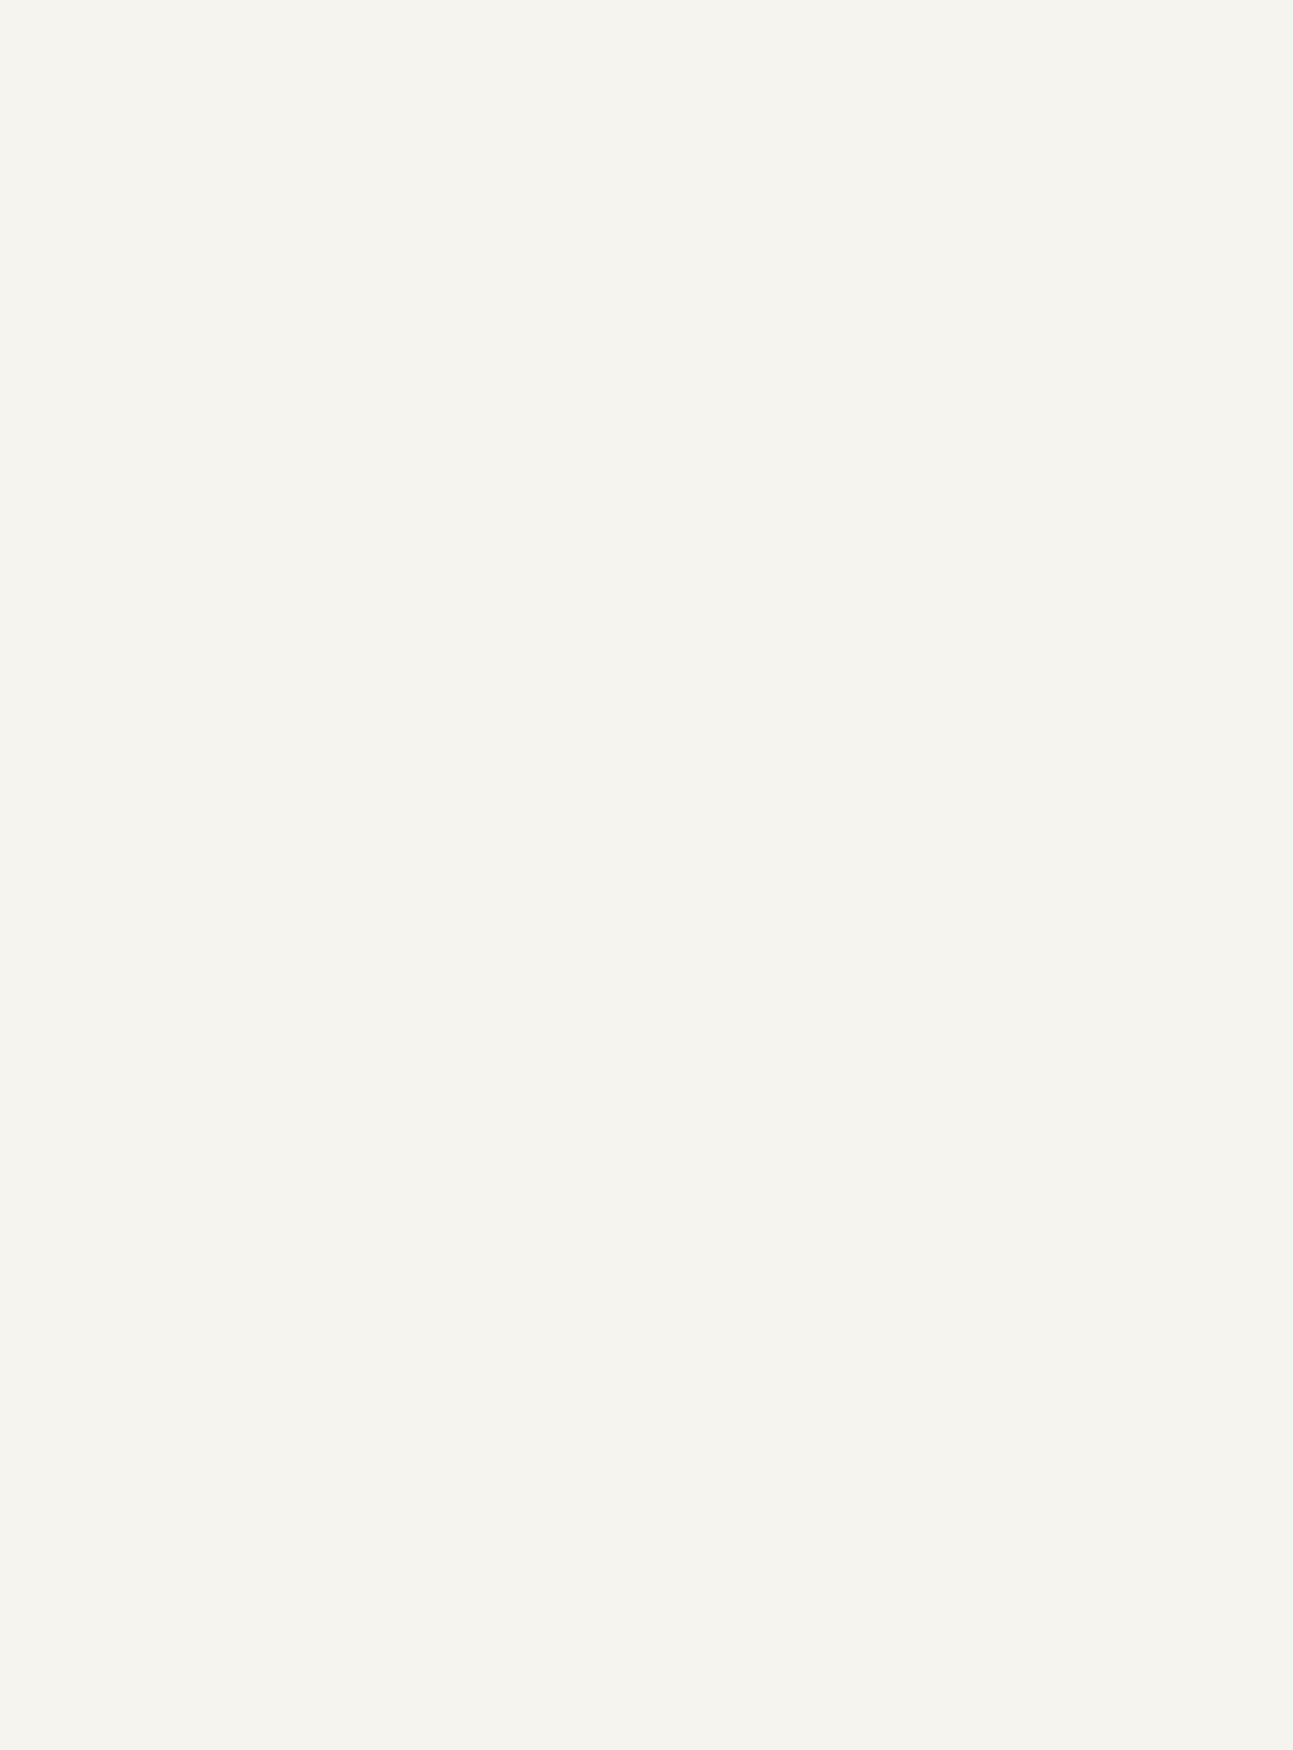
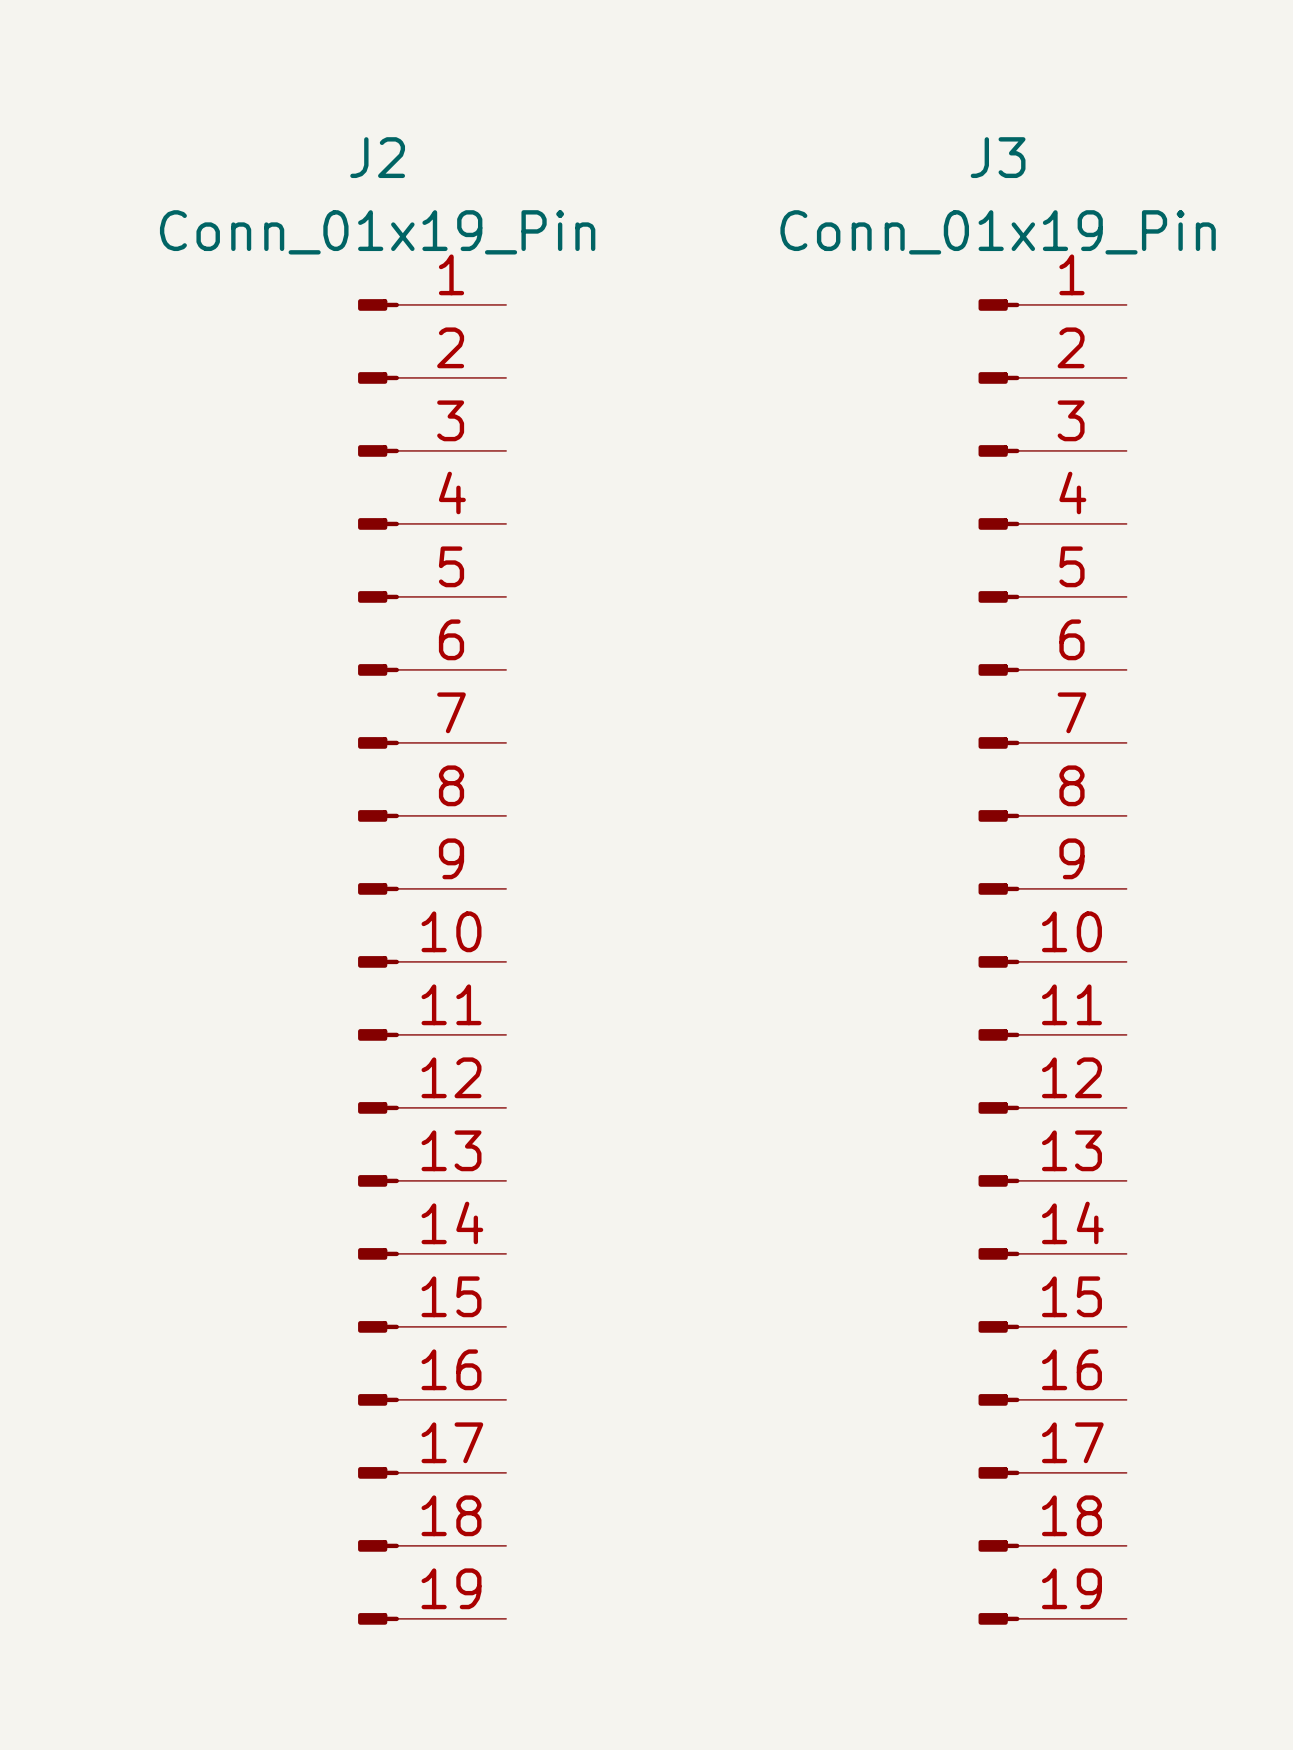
J2: none -> Conn_01x19_Pin (432, 961)
J3: none -> Conn_01x19_Pin (1052, 961)

